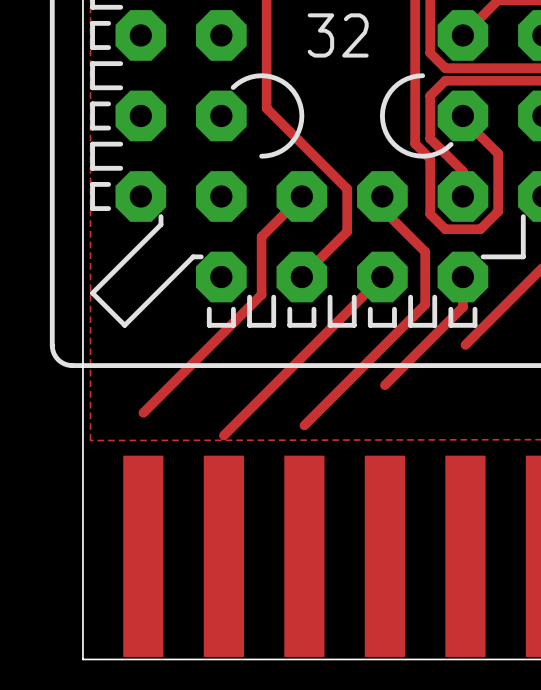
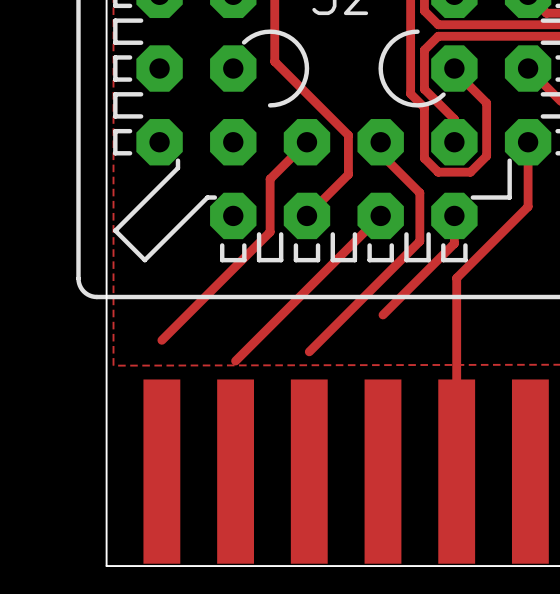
track: none -> (456, 278) (456, 471)

